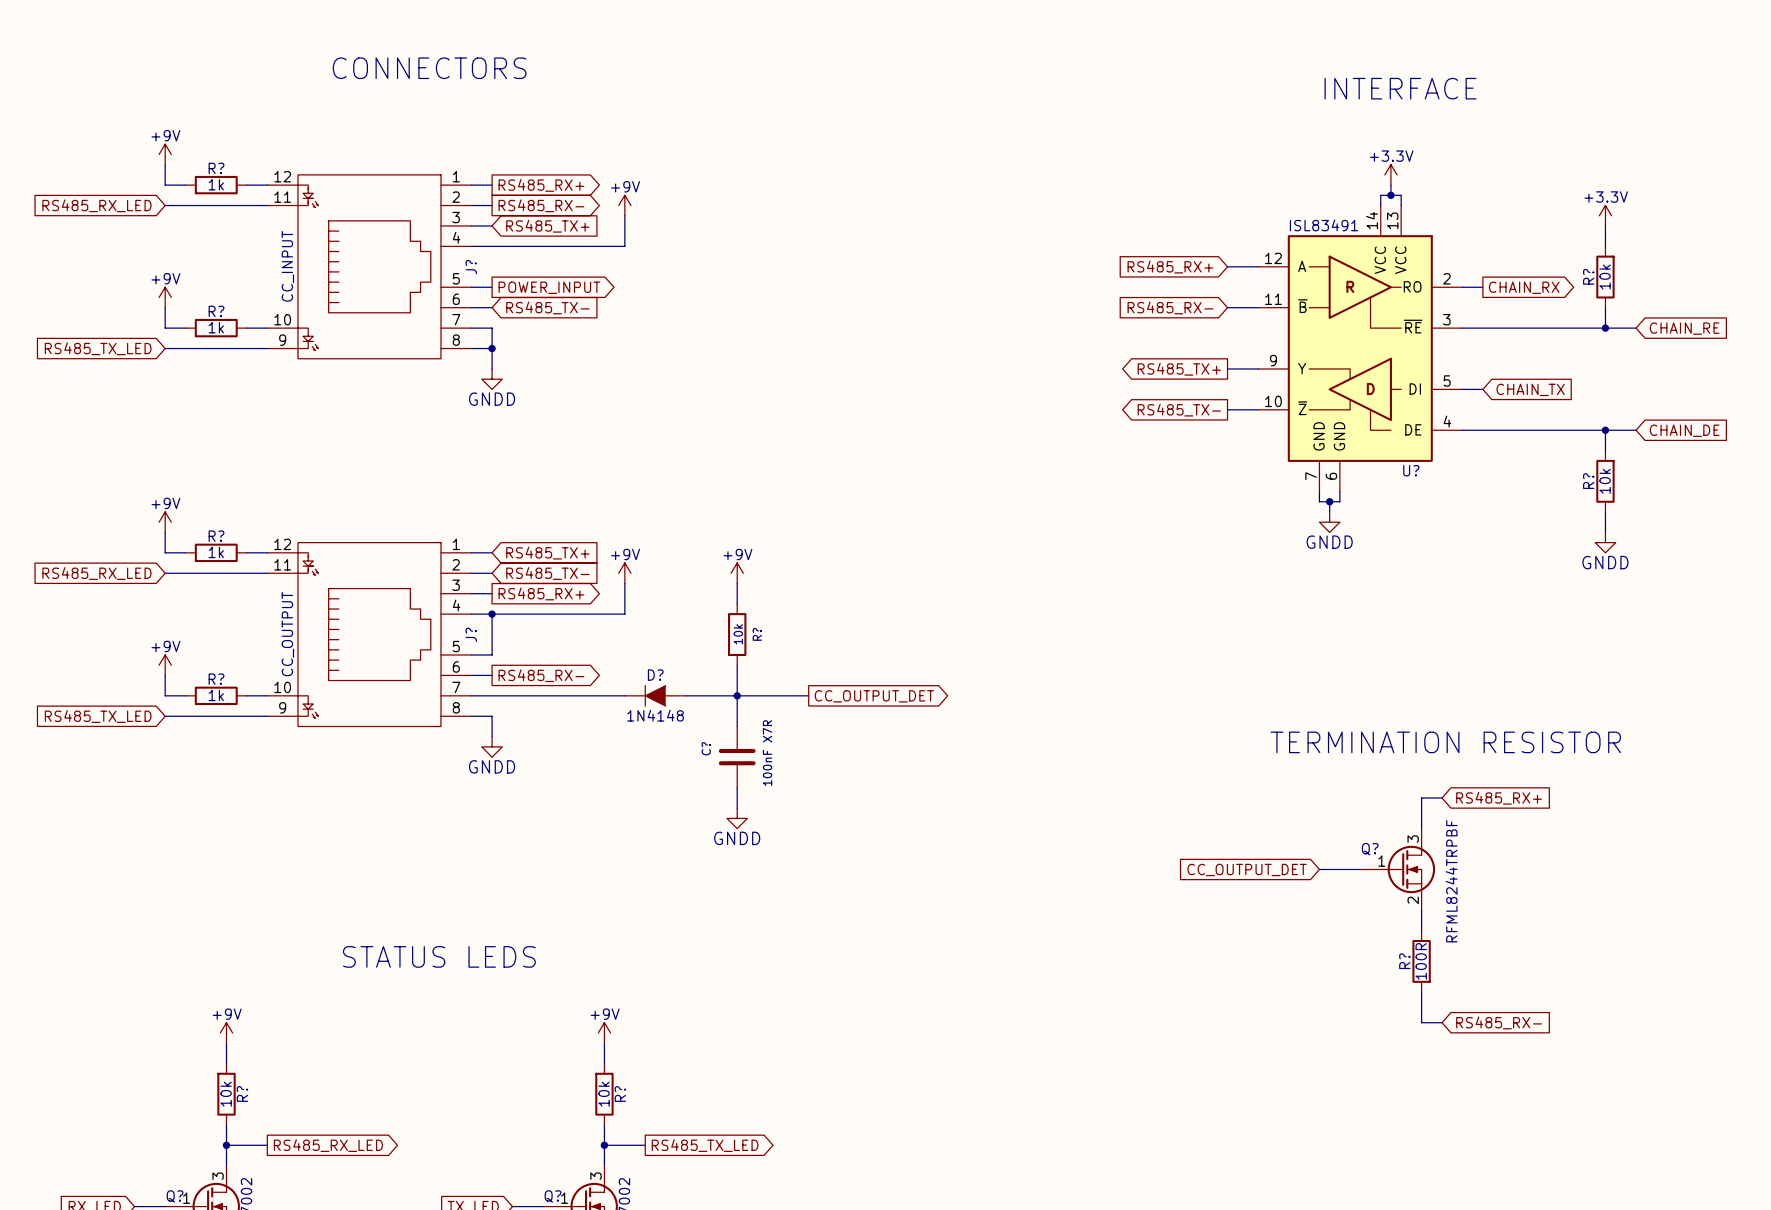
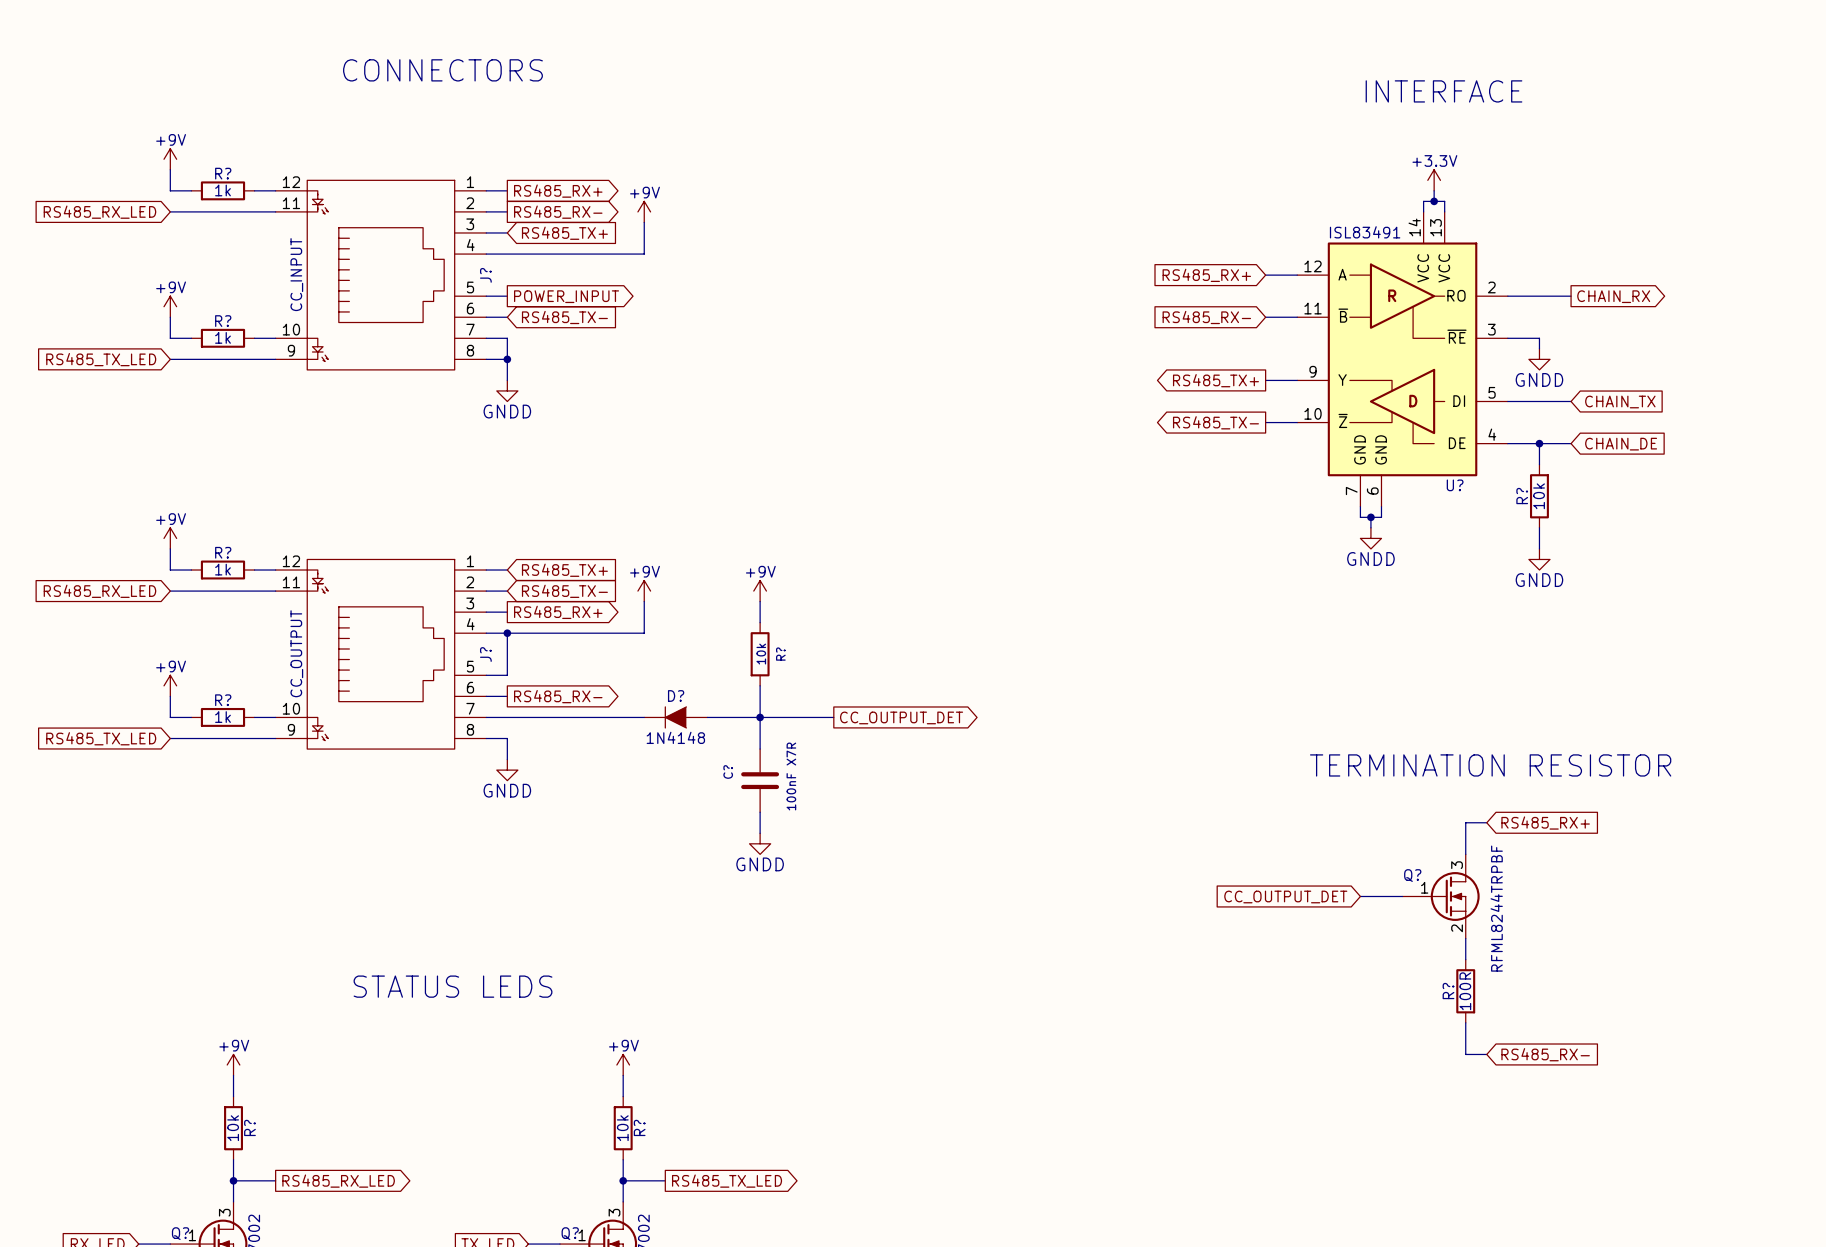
power symbol: +3.3V (1605, 215) -> none
wire: (1605, 225) (1605, 246) -> none
R?: 10k (1605, 277) -> none
wire: none -> (1528, 296) (1571, 296)
global label position: CHAIN_RX (1524, 287) -> CHAIN_RX (1613, 296)
wire: (1605, 307) (1605, 328) -> none
wire: (1493, 328) (1636, 328) -> (1539, 338) (1539, 348)
junction: (1605, 328) -> none
global label: CHAIN_RE (1684, 328) -> none
power symbol: none -> GNDD (1539, 359)
wire: none -> (1528, 401) (1571, 401)
global label position: CHAIN_TX (1530, 389) -> CHAIN_TX (1620, 401)
junction: none -> (1539, 443)
wire: (1523, 430) (1636, 430) -> none
wire: (1605, 430) (1605, 450) -> (1539, 443) (1539, 464)
junction: (1605, 430) -> none
global label position: CHAIN_DE (1684, 430) -> CHAIN_DE (1621, 444)
R? position: (1605, 481) -> (1539, 496)
wire: (1605, 511) (1605, 532) -> (1539, 527) (1539, 548)
power symbol: none -> GNDD (1539, 559)
power symbol: GNDD (1605, 542) -> none

